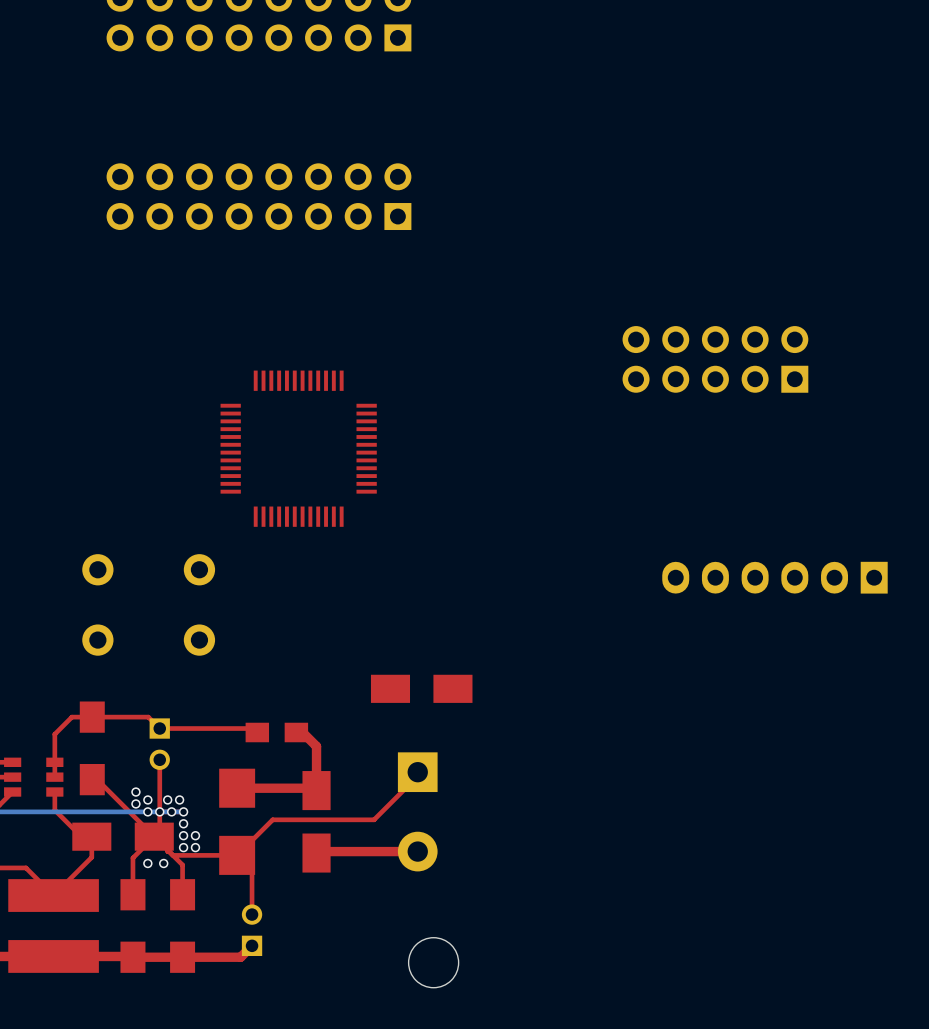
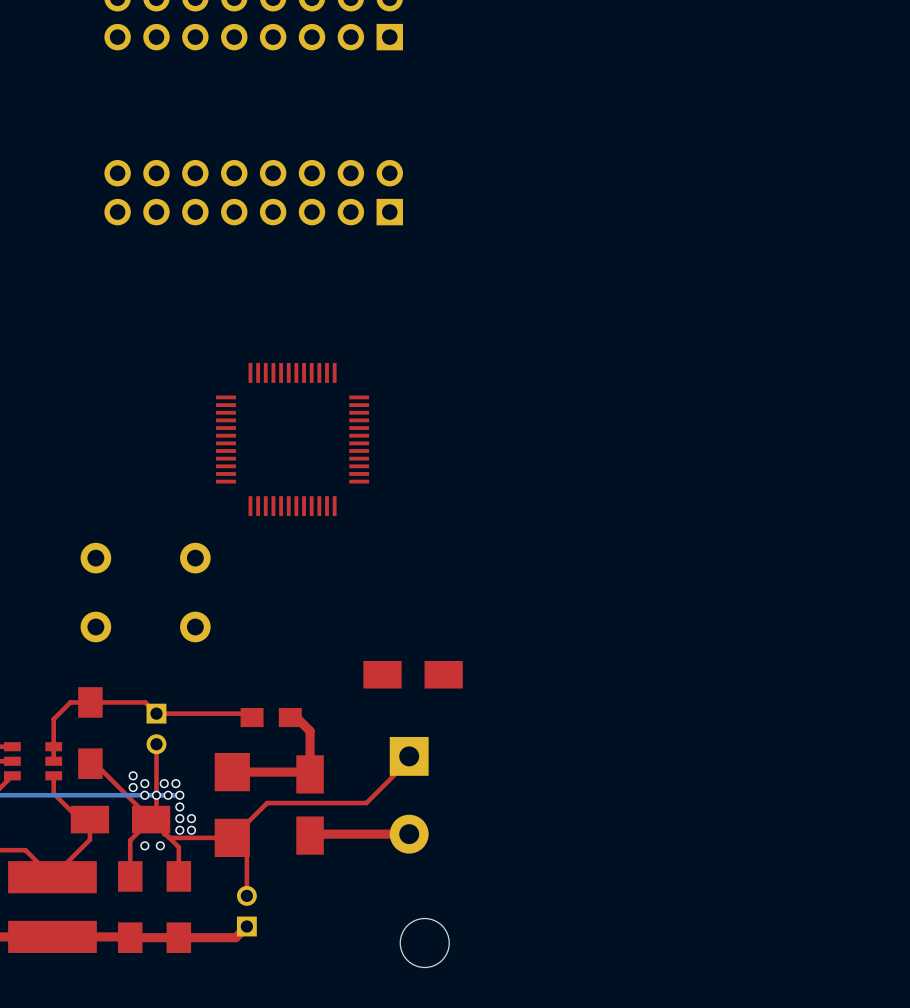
part: (715, 359) -> none
part: (774, 577) -> none

